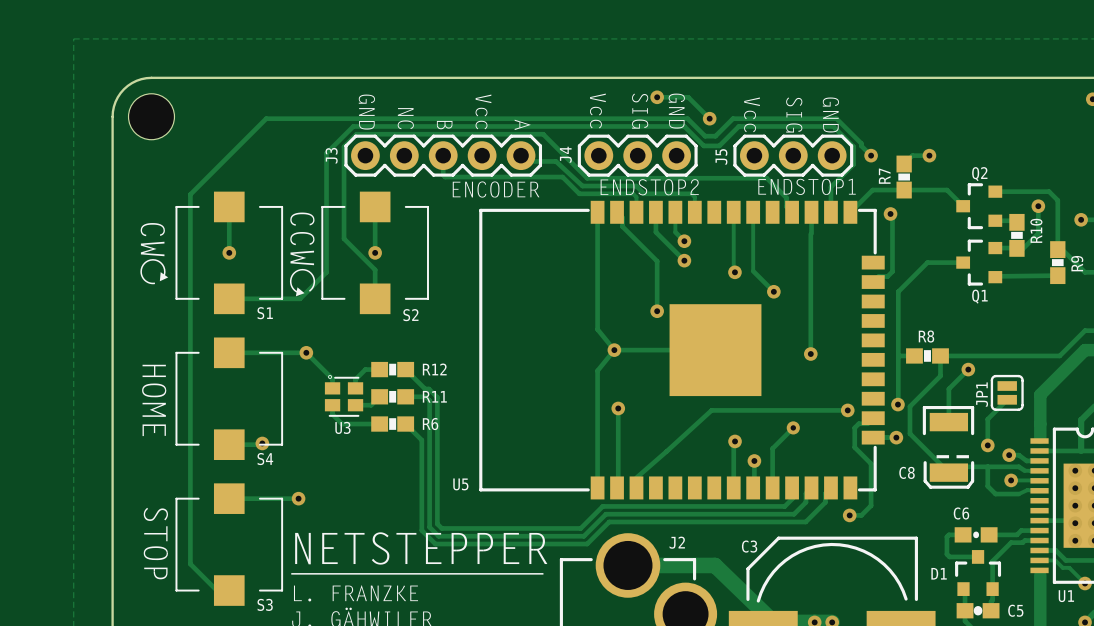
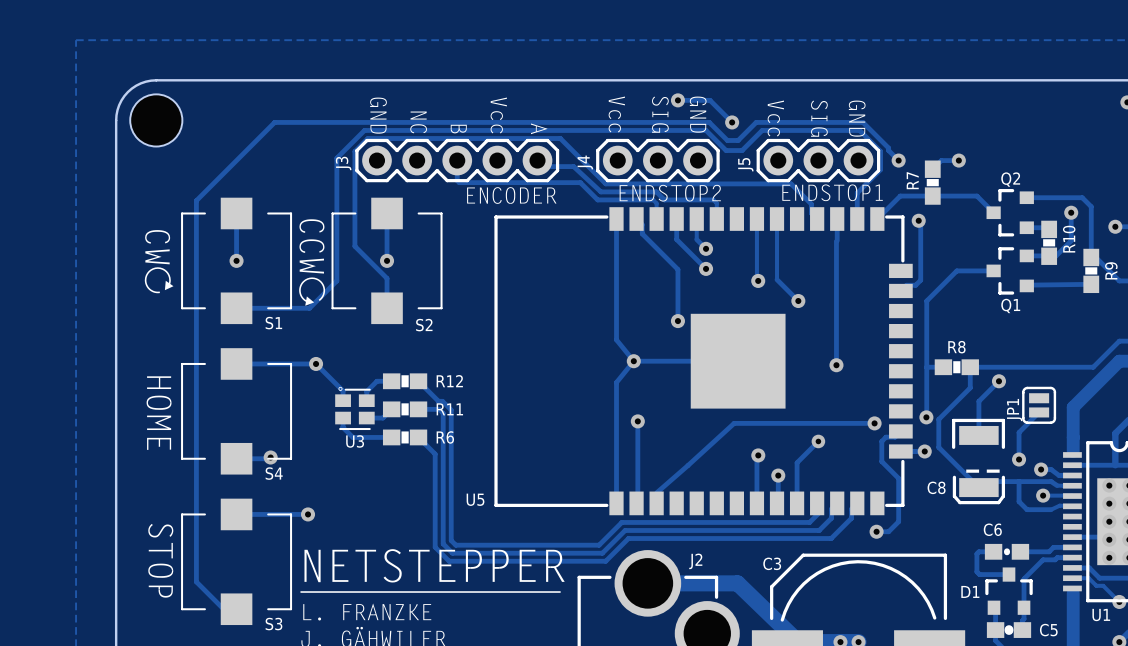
hole: (151, 116) -> none
part: none -> (156, 120)

